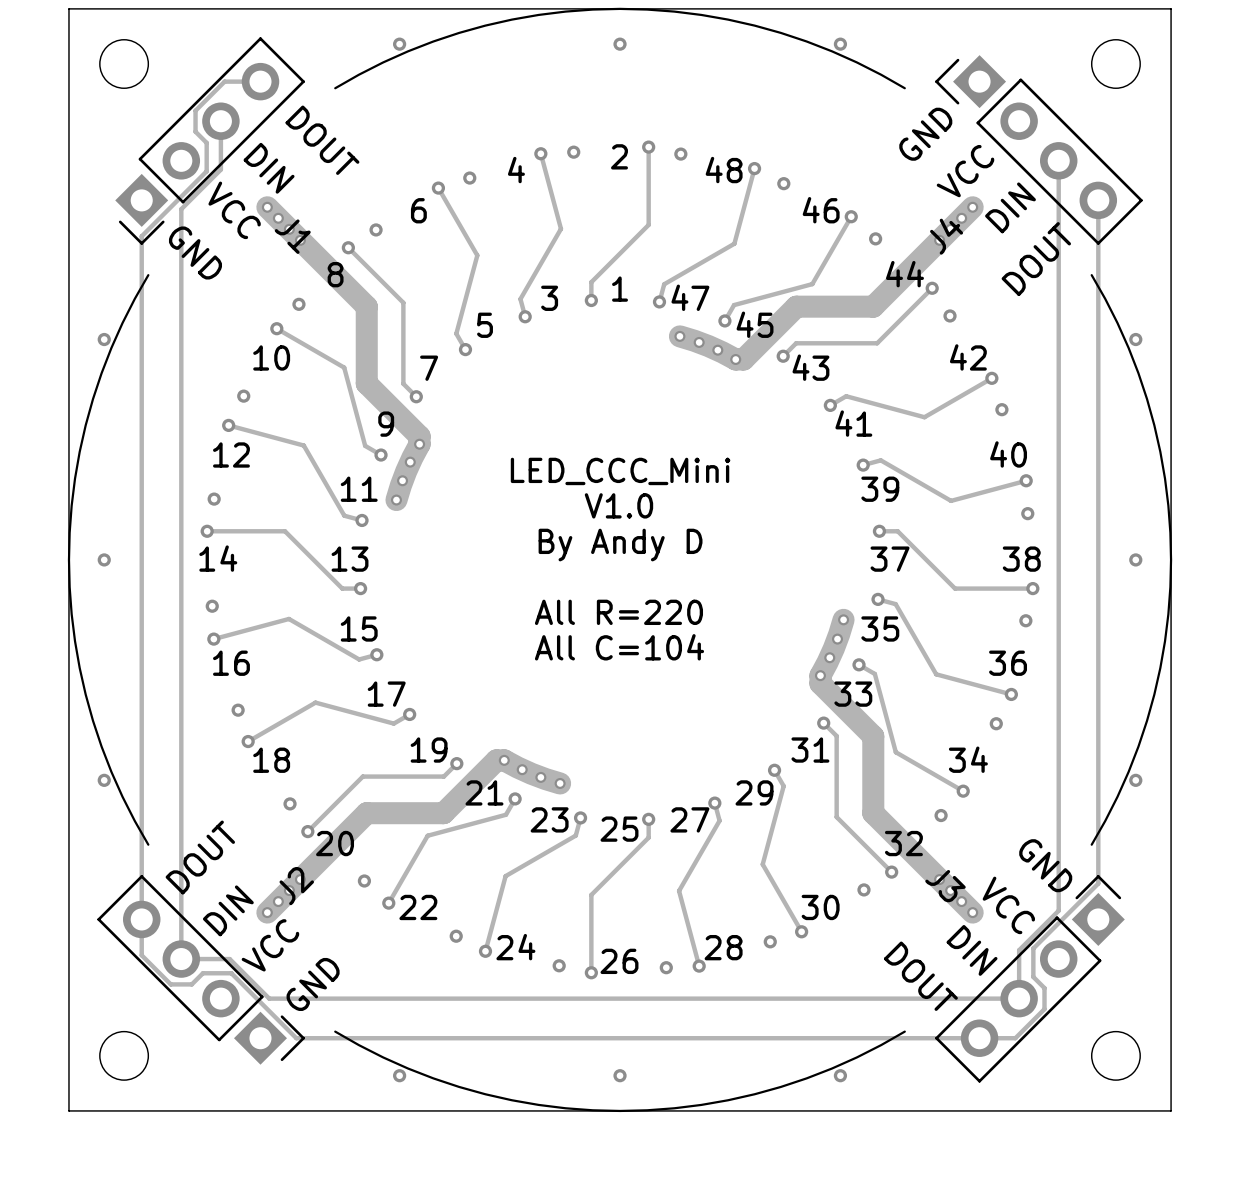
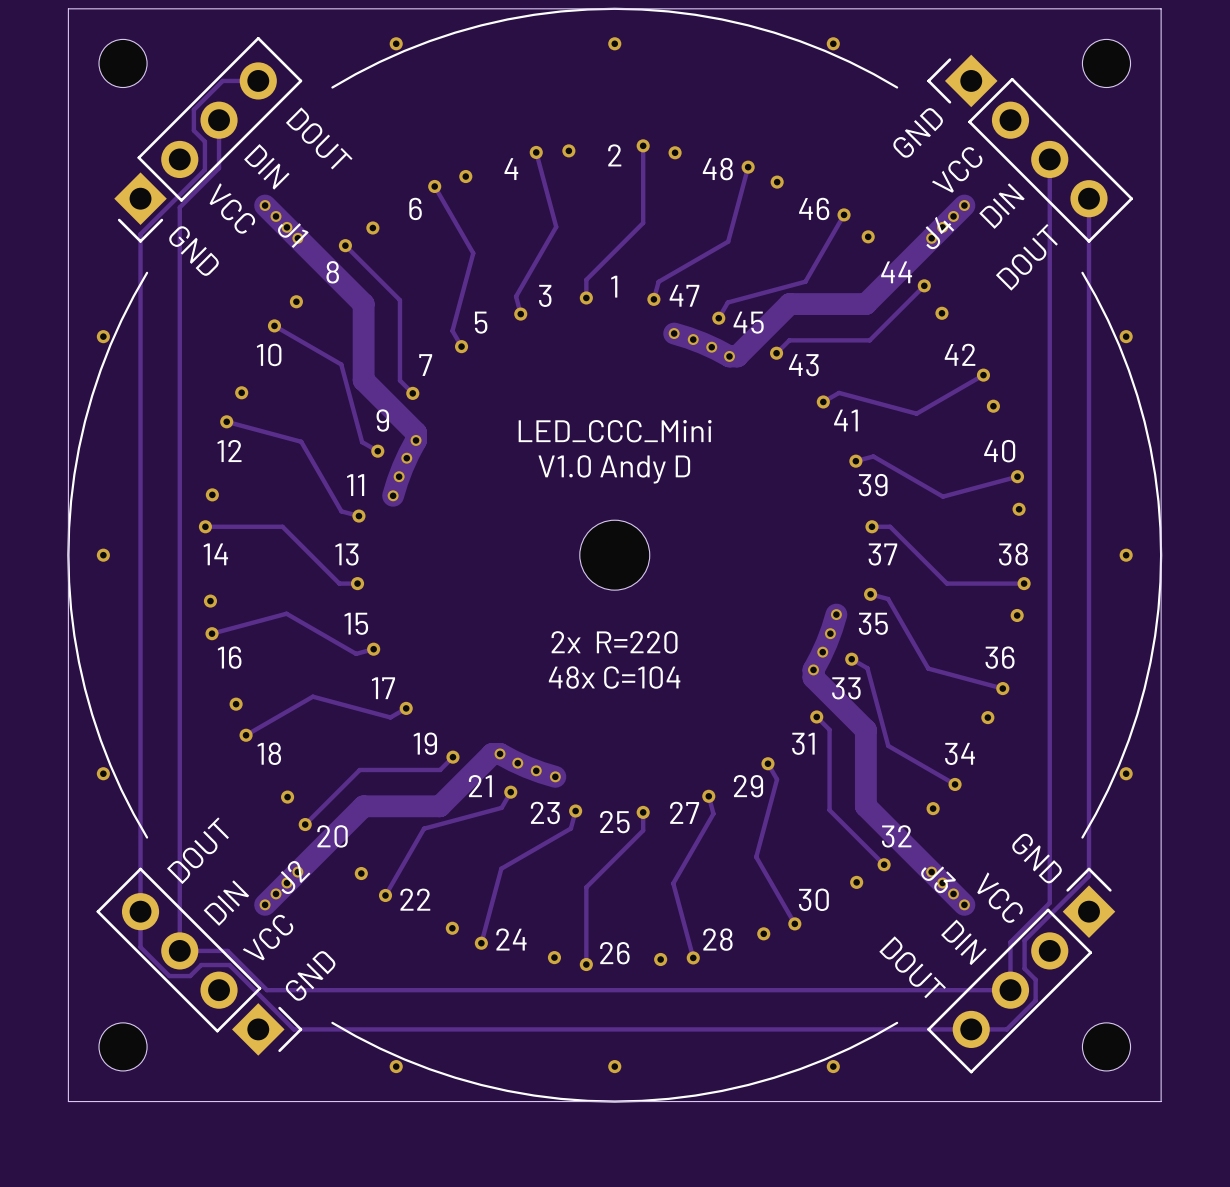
text: none -> LED_CCC_Mini (615, 431)
text: LED_CCC_Mini (620, 471) -> V1.0 Andy D (614, 469)
text: V1.0 (618, 505) -> none
text: By Andy D (620, 545) -> none
part: none -> (614, 555)
text: All R=220 (618, 612) -> none
text: All C=104 (619, 647) -> 2x R=220 (614, 642)
text: none -> 48x C=104 (614, 677)

